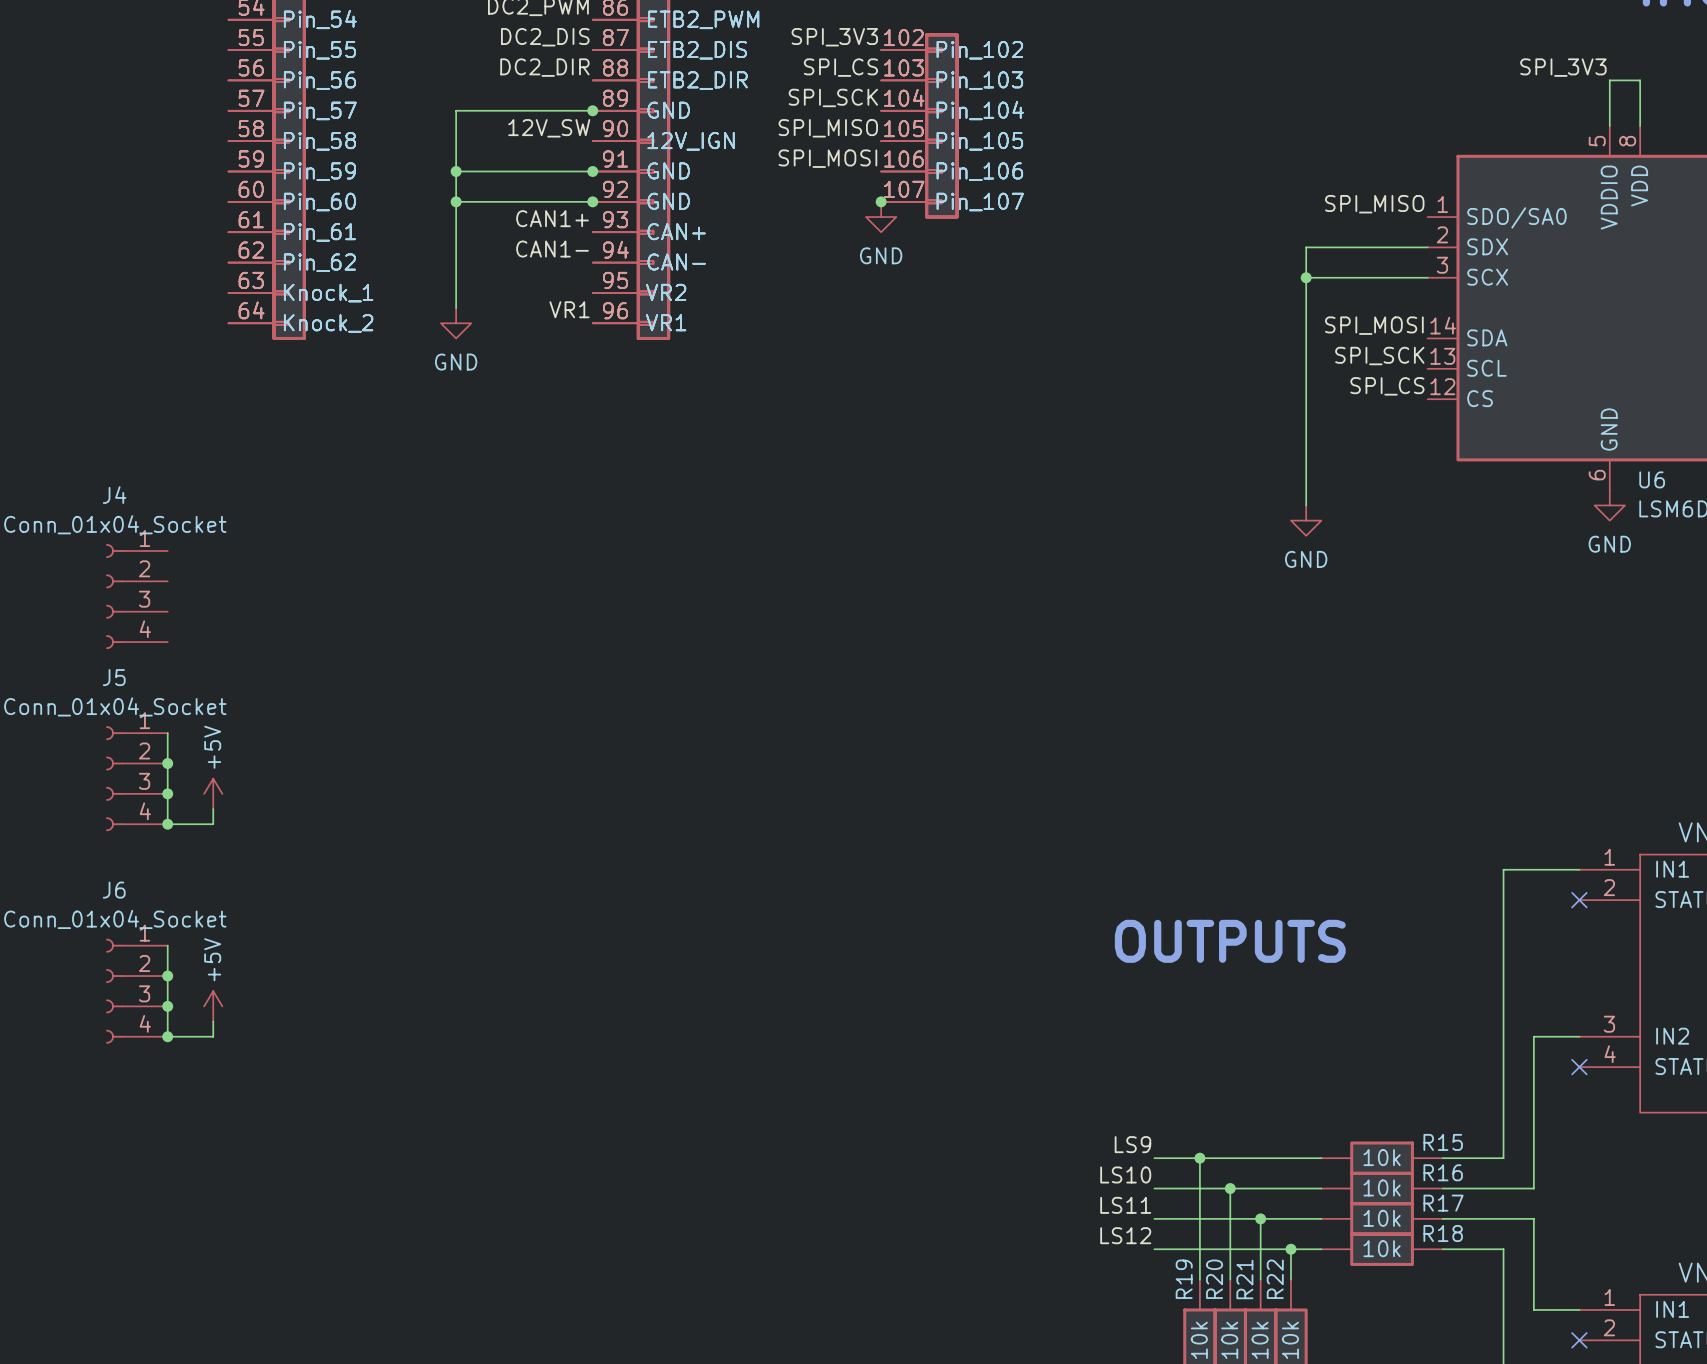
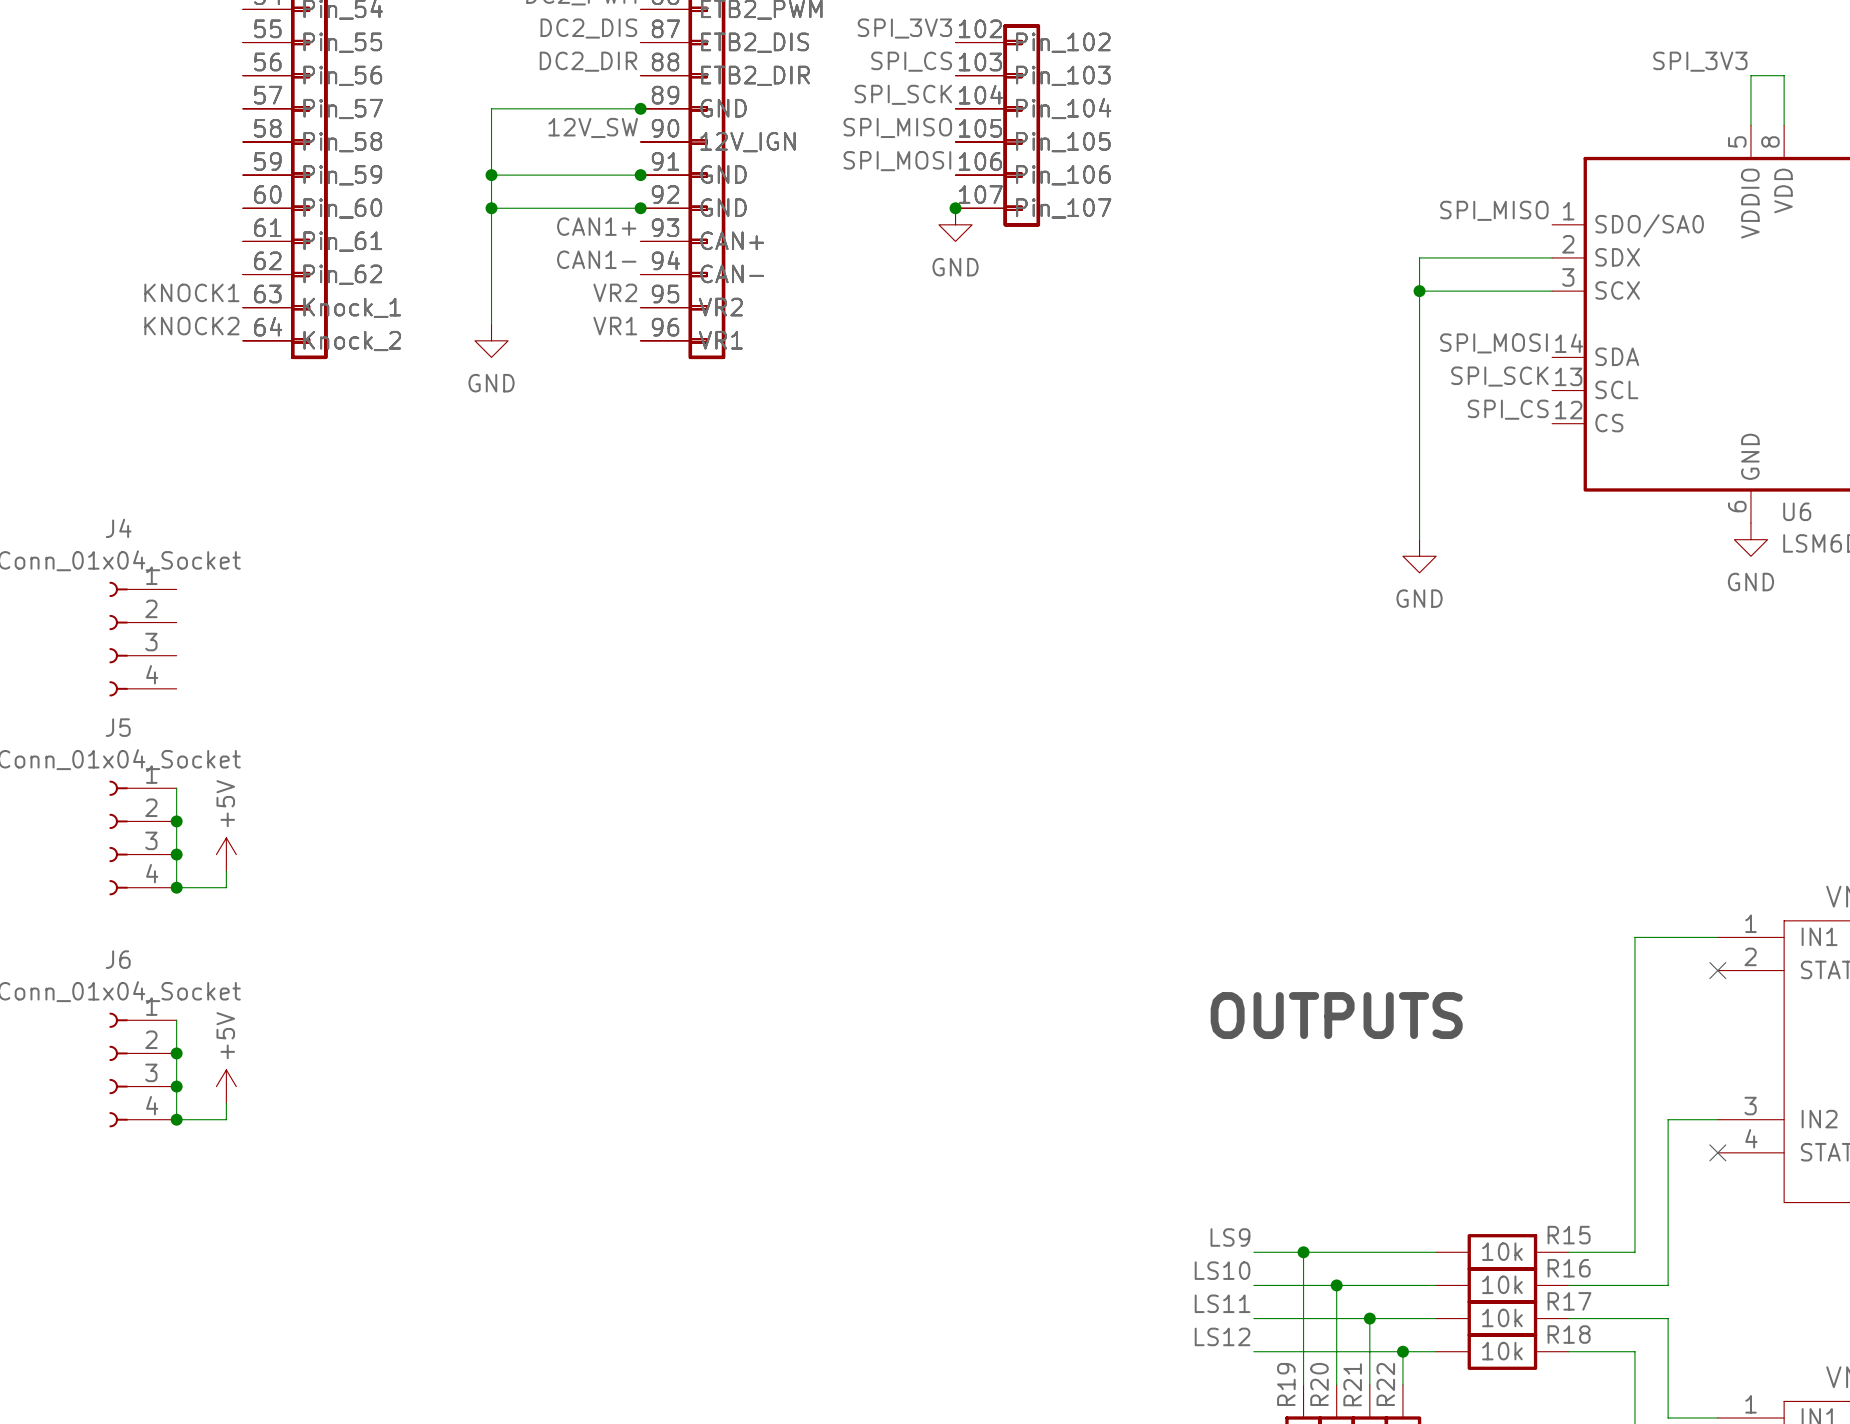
label: none -> KNOCK1 (191, 292)
label: none -> VR2 (615, 292)
label: none -> KNOCK2 (191, 326)

